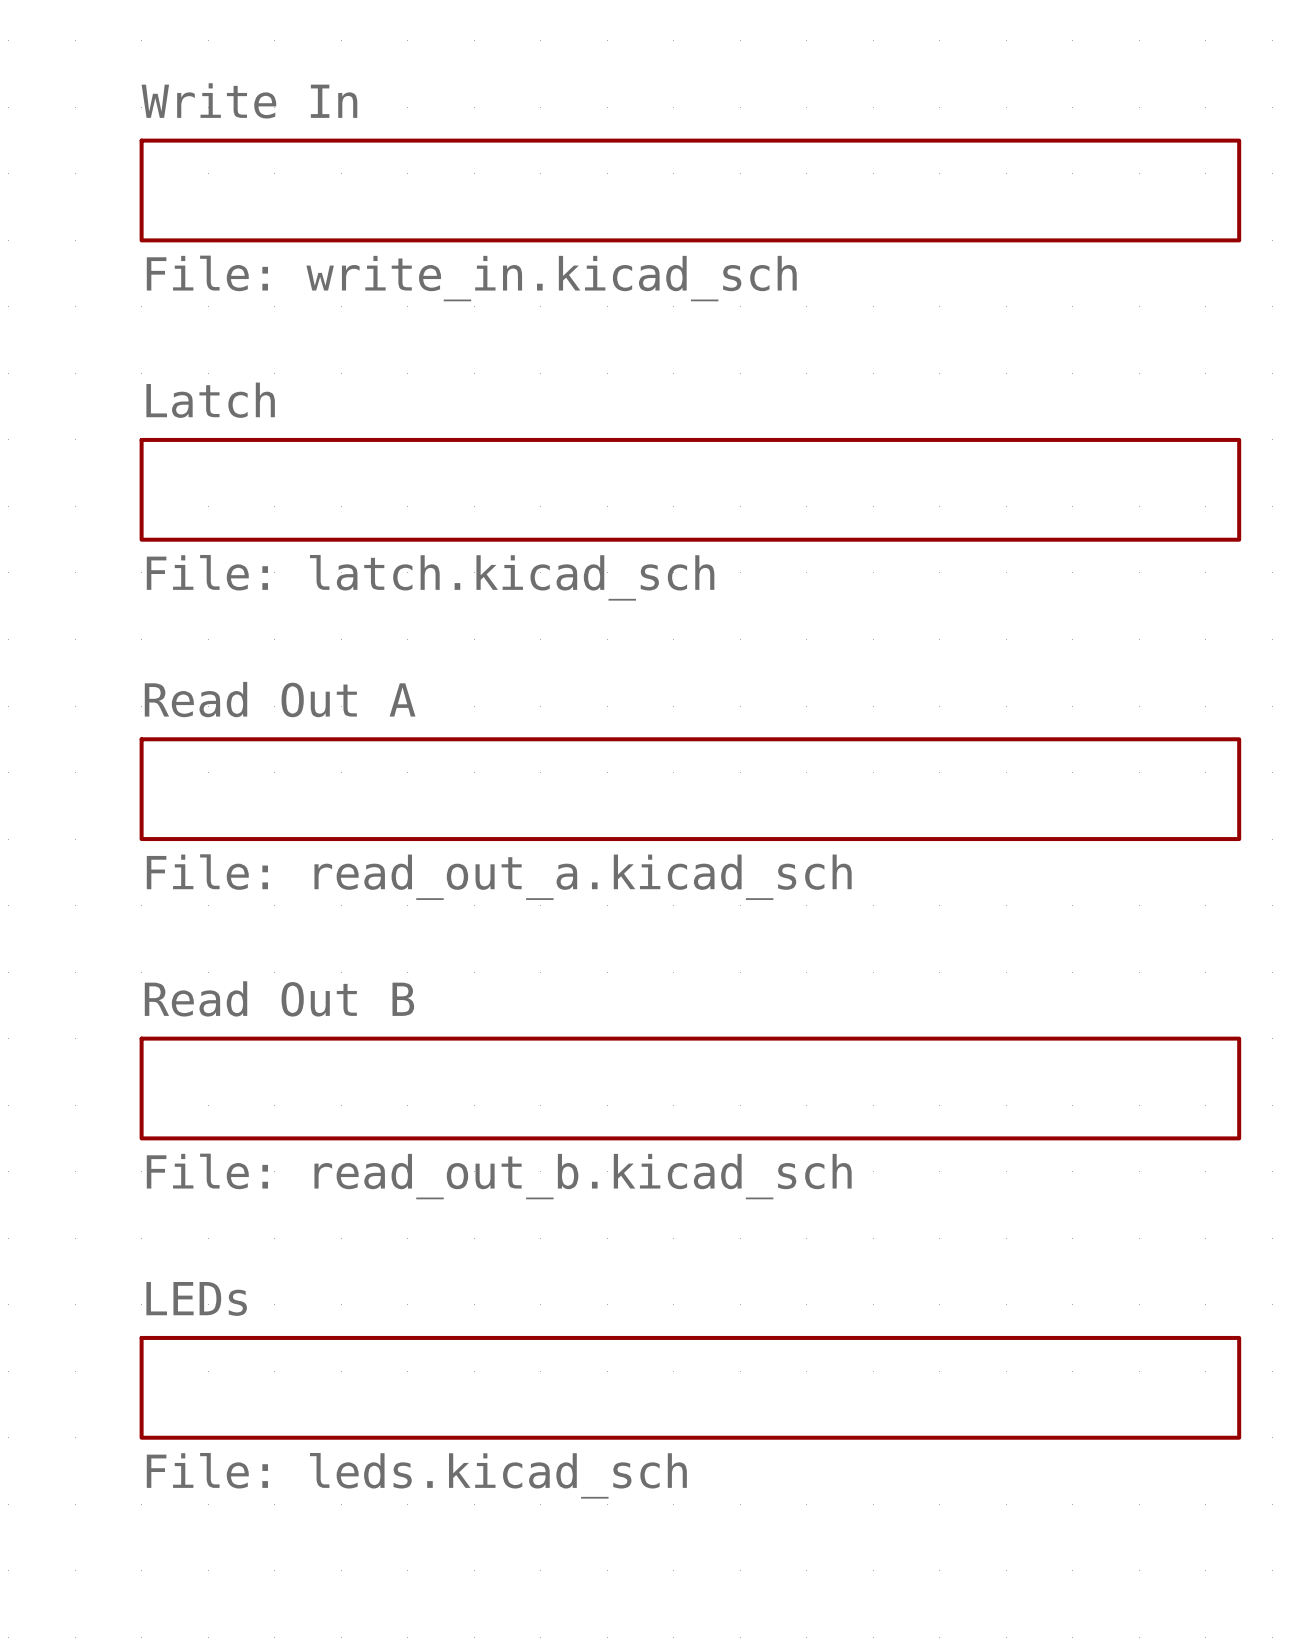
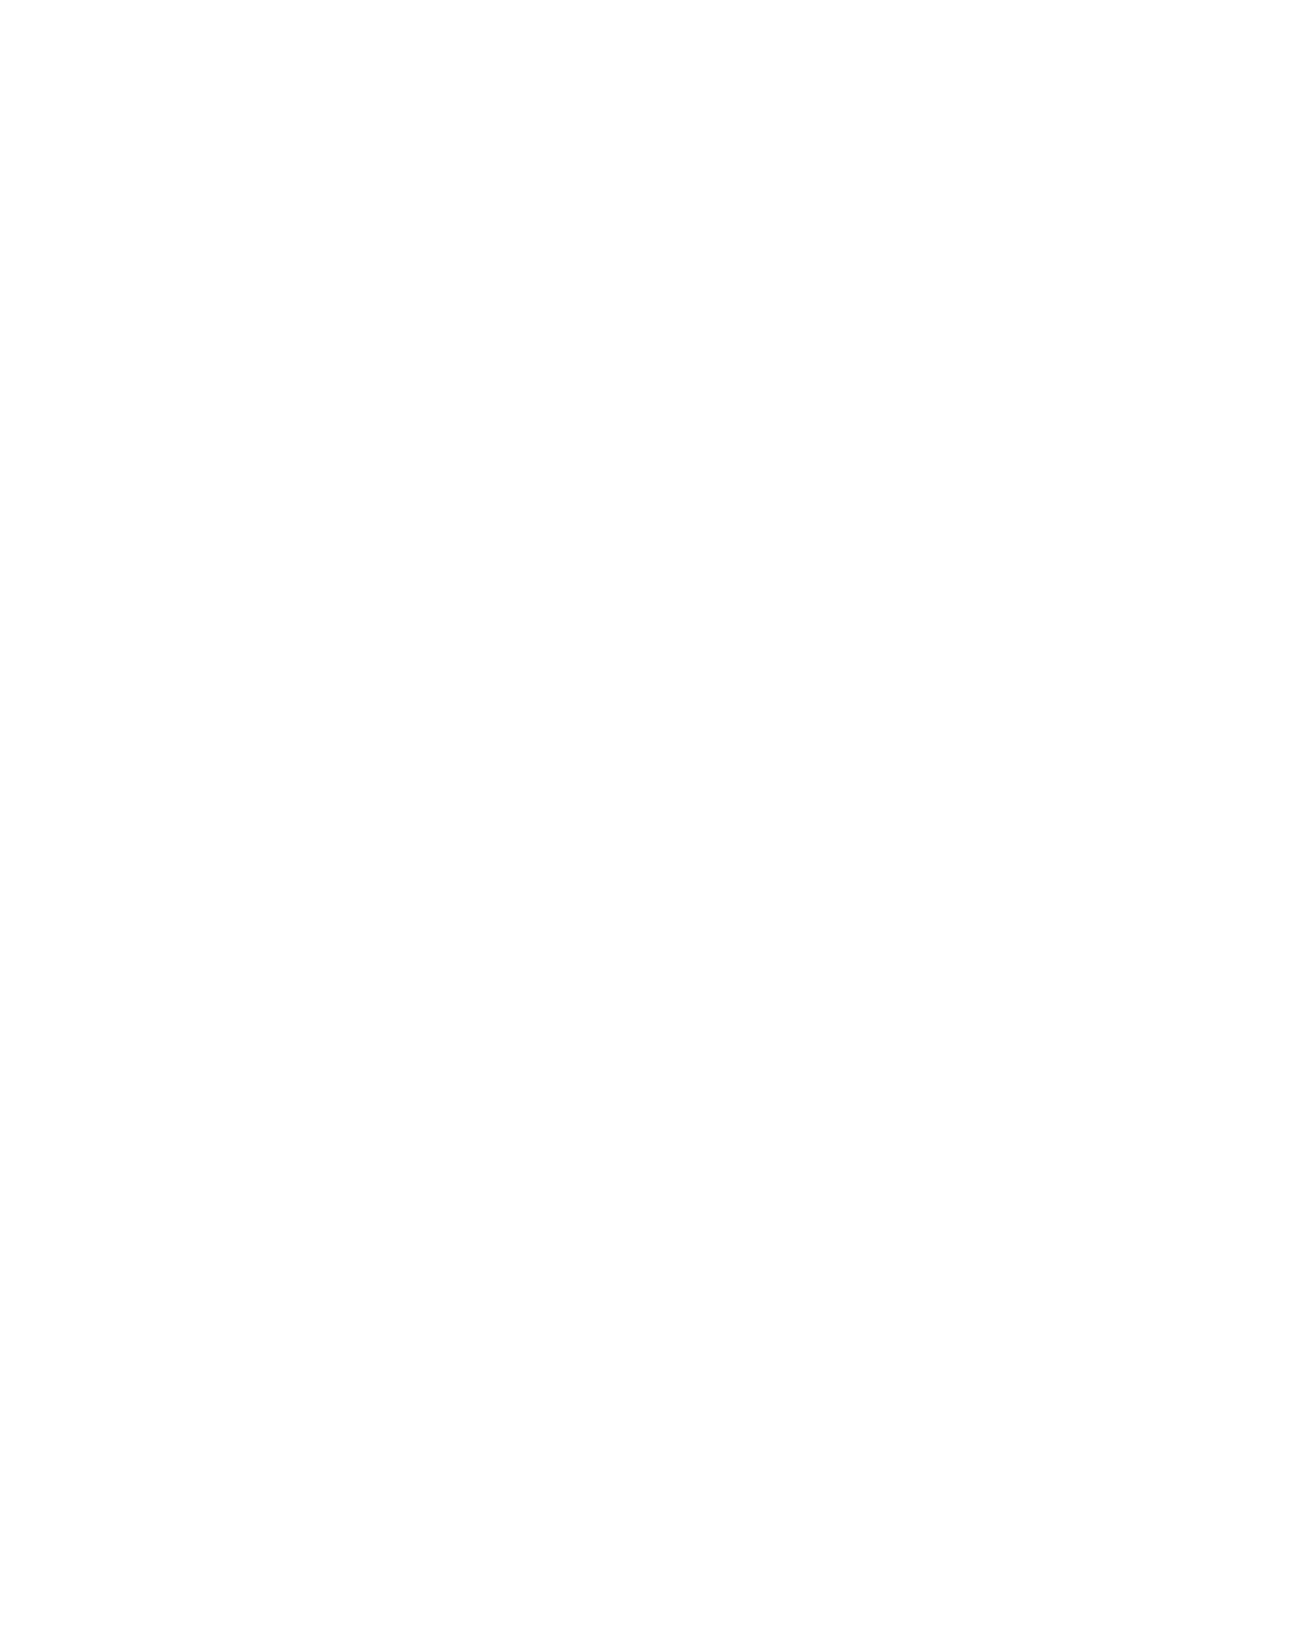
sheet Write In: File: write_in.kicad_sch (690, 190) -> none
sheet Latch: File: latch.kicad_sch (690, 489) -> none
sheet Read Out A: File: read_out_a.kicad_sch (690, 789) -> none
sheet Read Out B: File: read_out_b.kicad_sch (690, 1088) -> none
sheet LEDs: File: leds.kicad_sch (690, 1387) -> none

